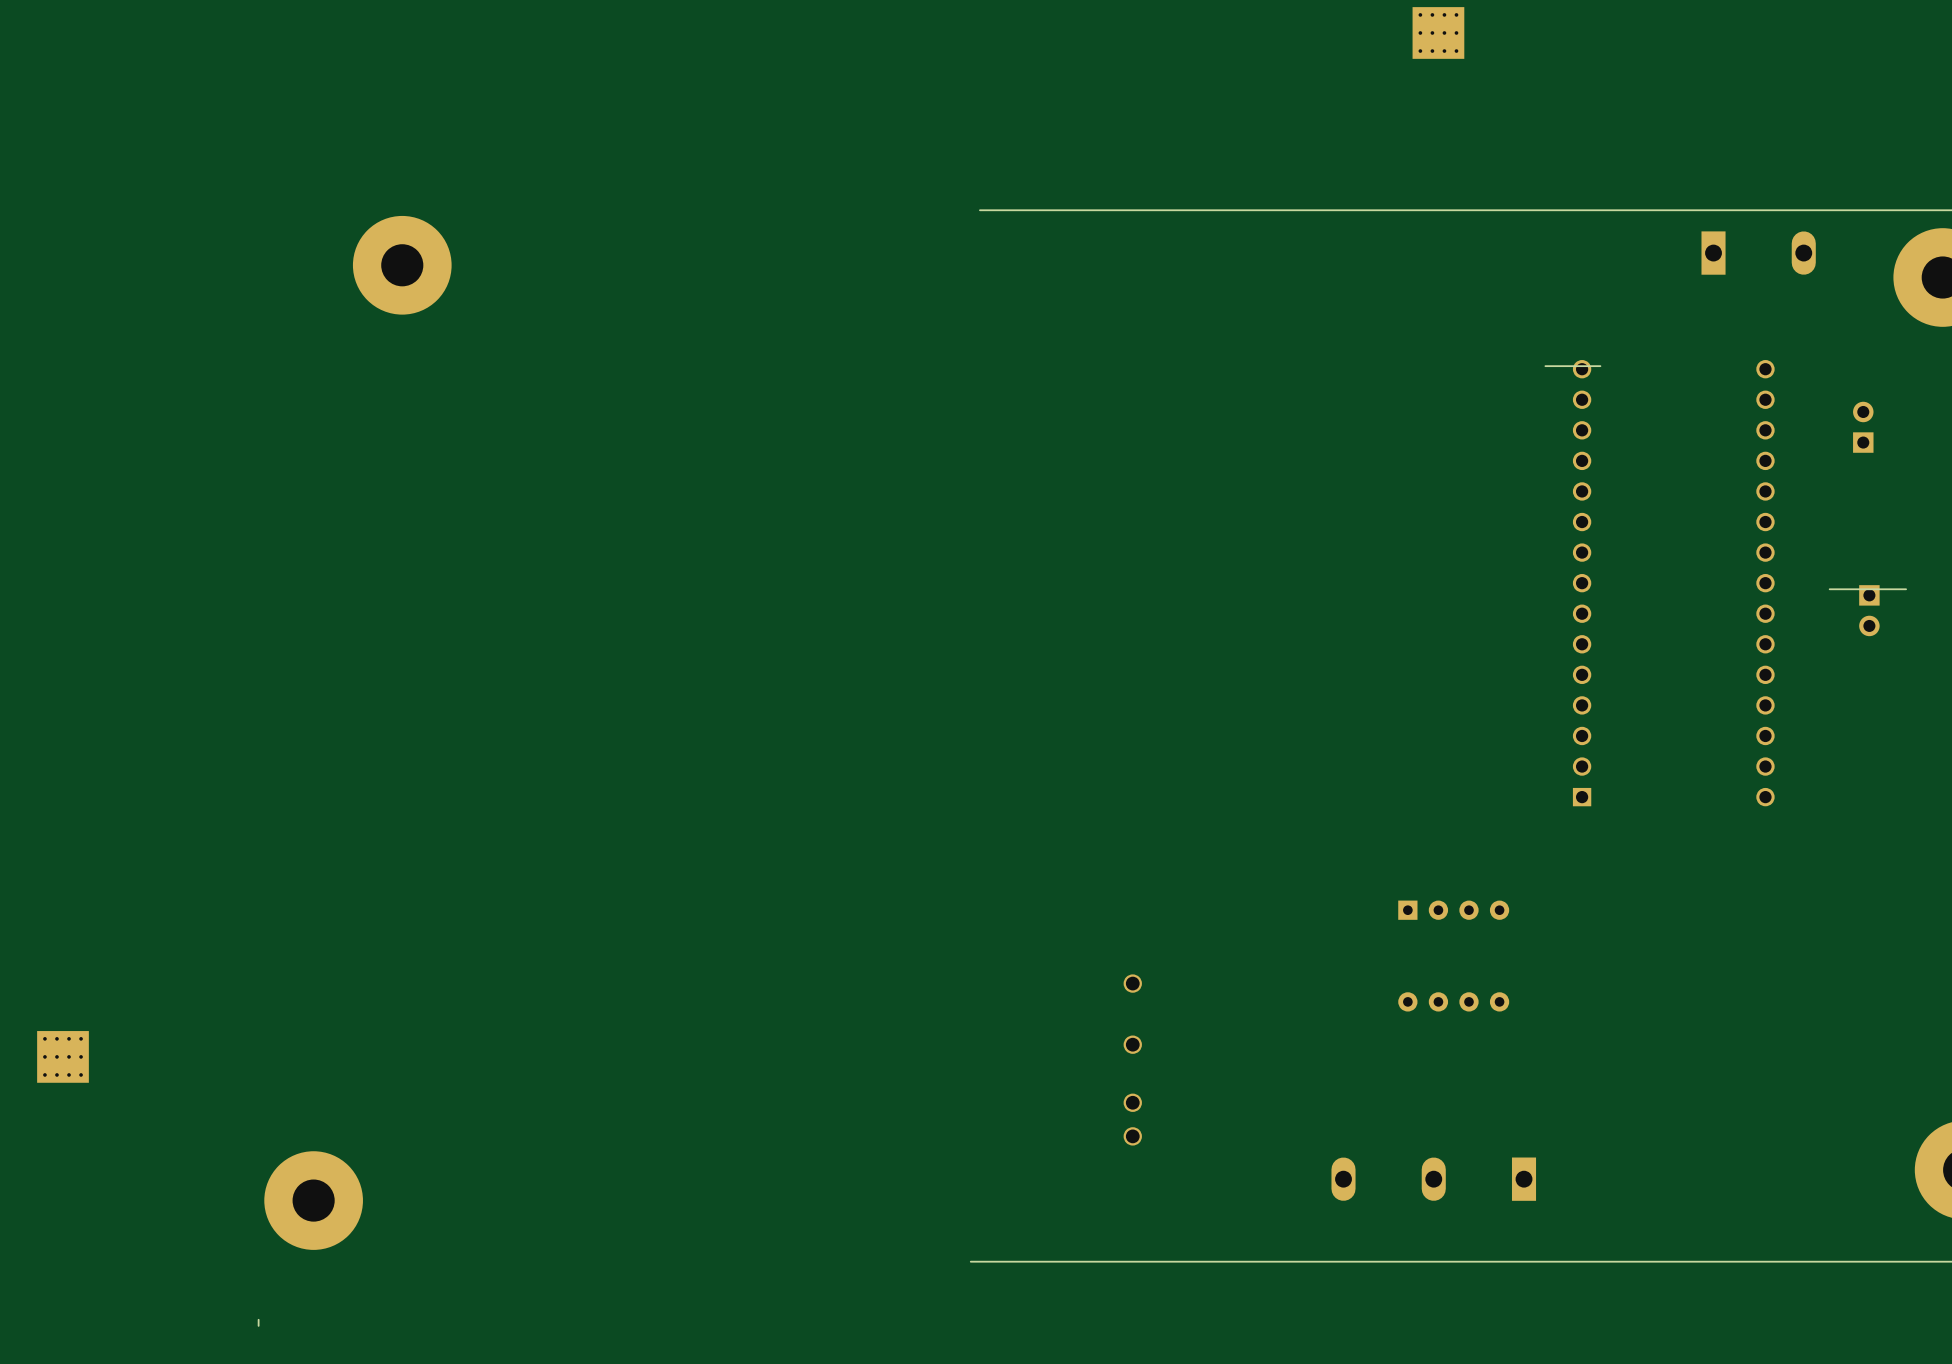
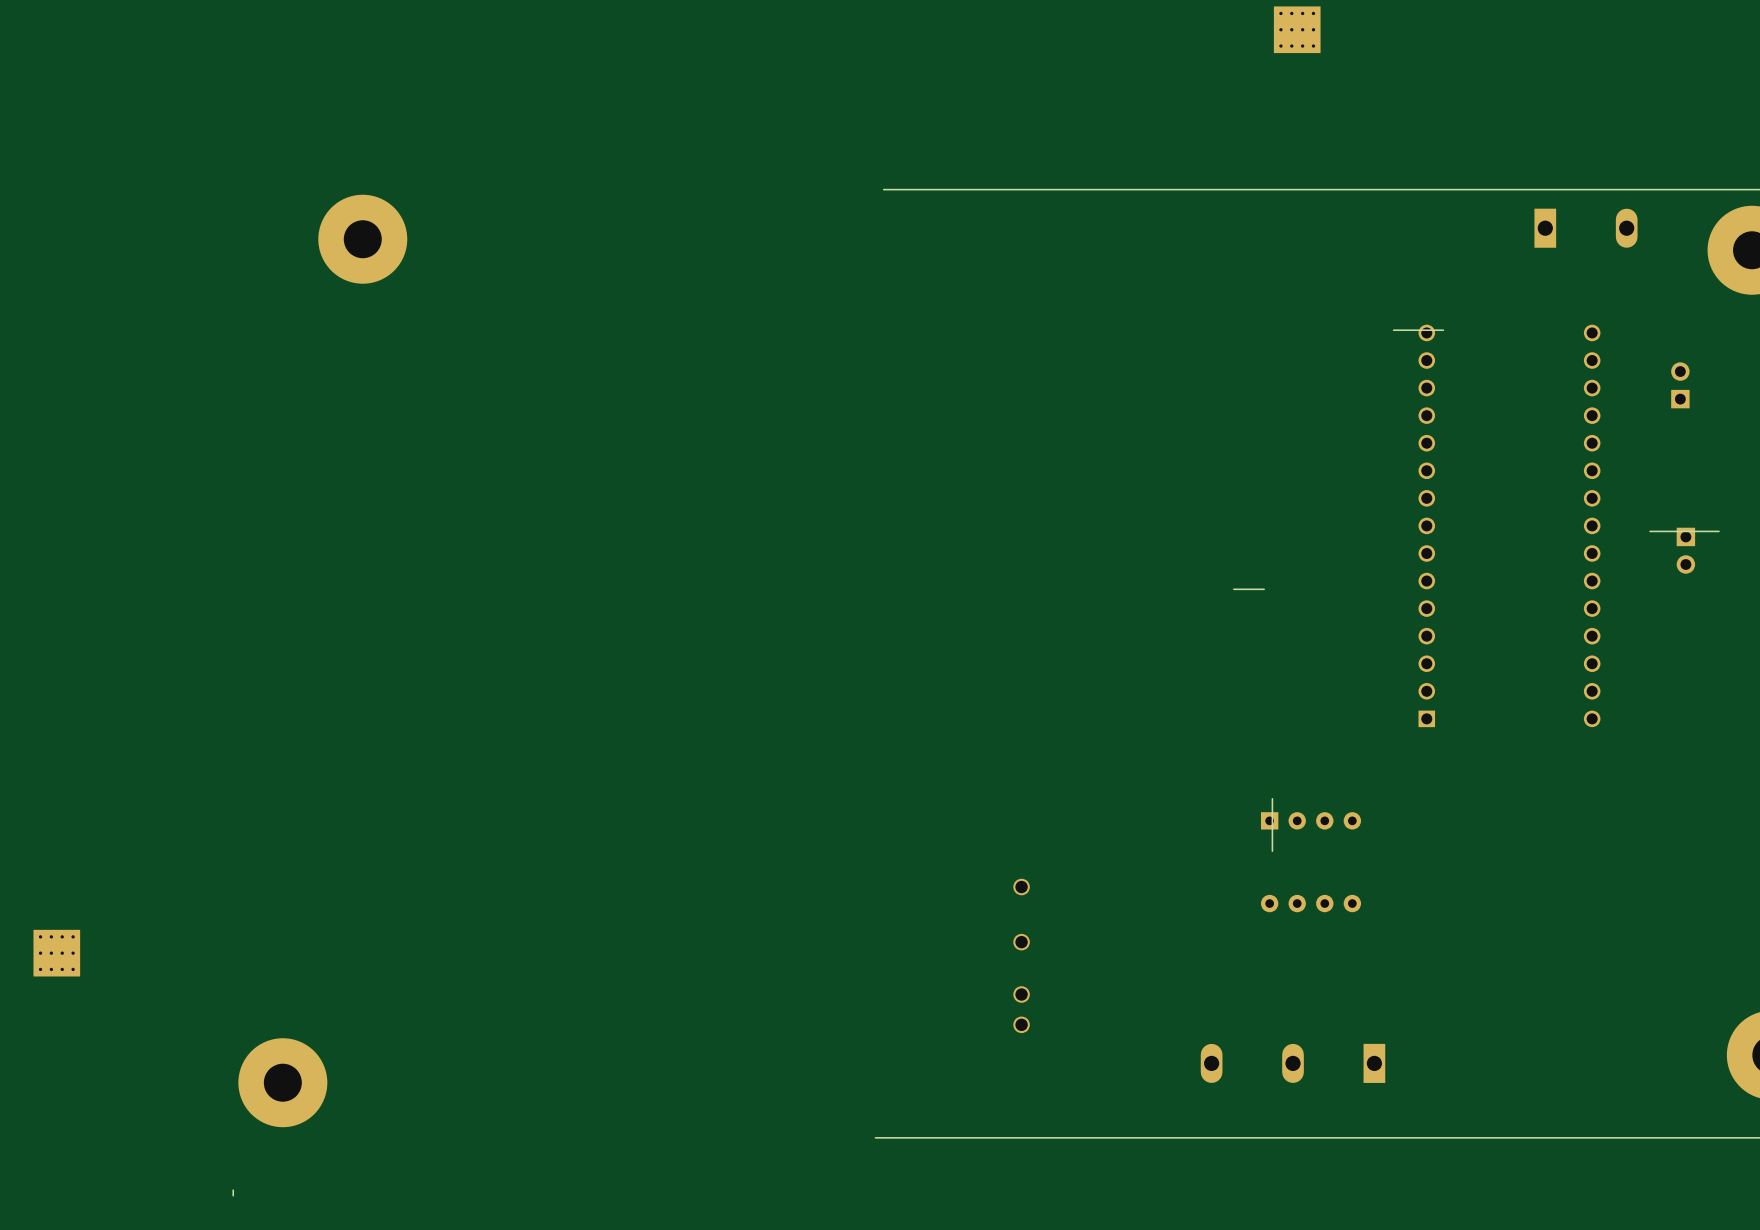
board edge: none -> (1264, 589) (1233, 589)
board edge: none -> (1272, 798) (1272, 851)

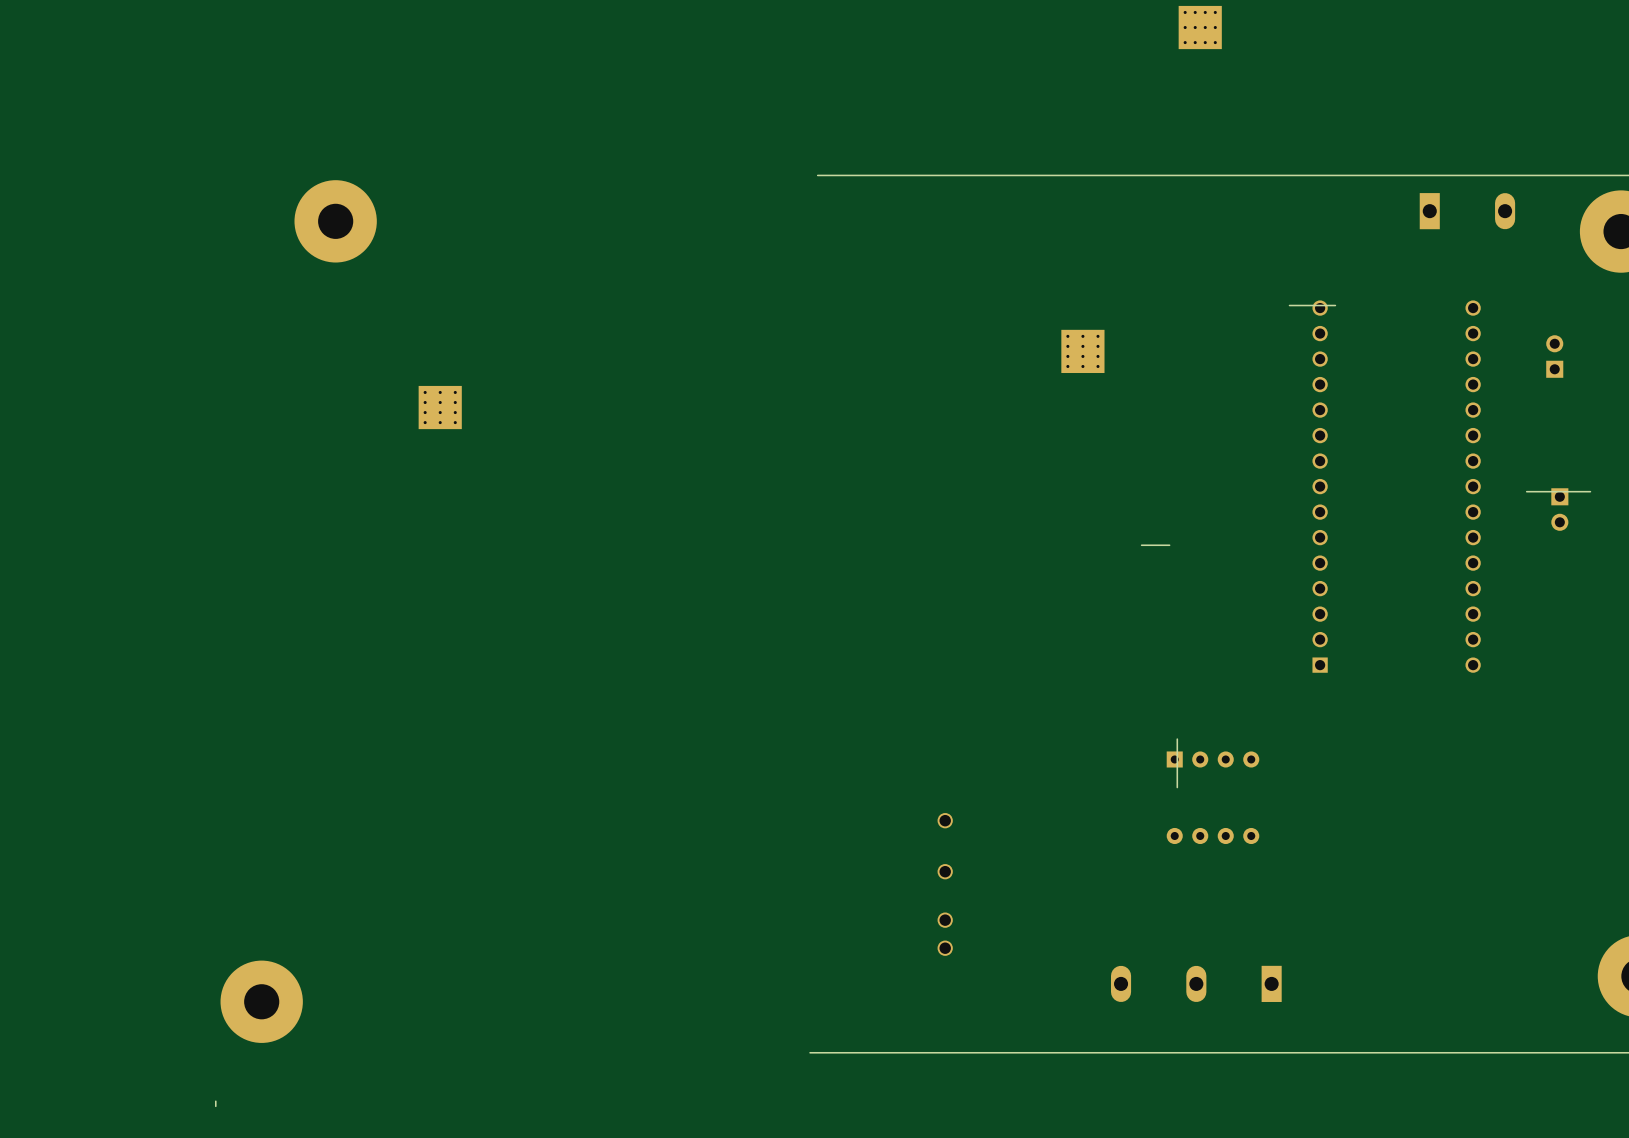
part: none -> (1082, 351)
part: none -> (440, 407)
part: (56, 953) -> none

